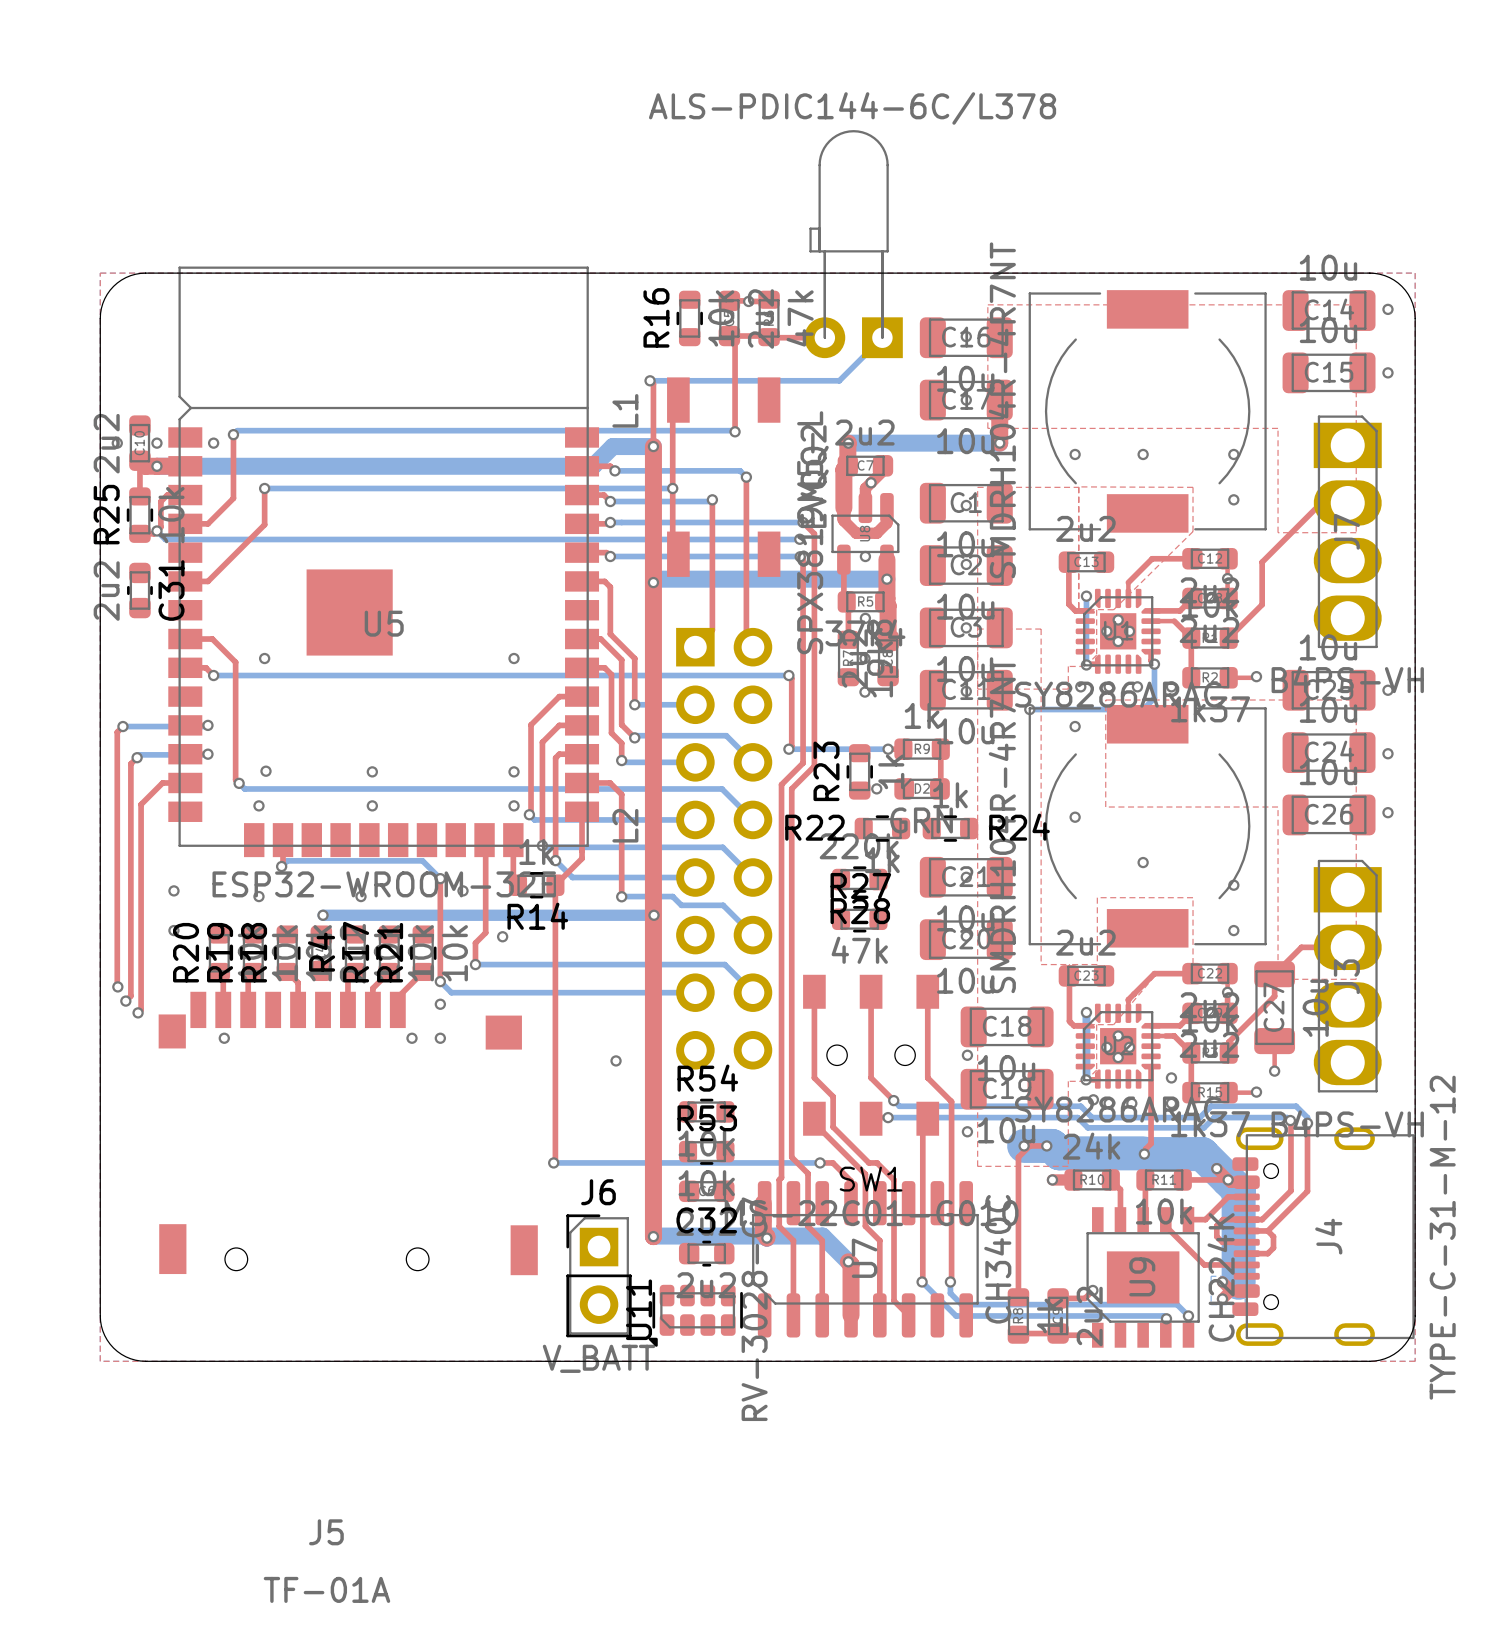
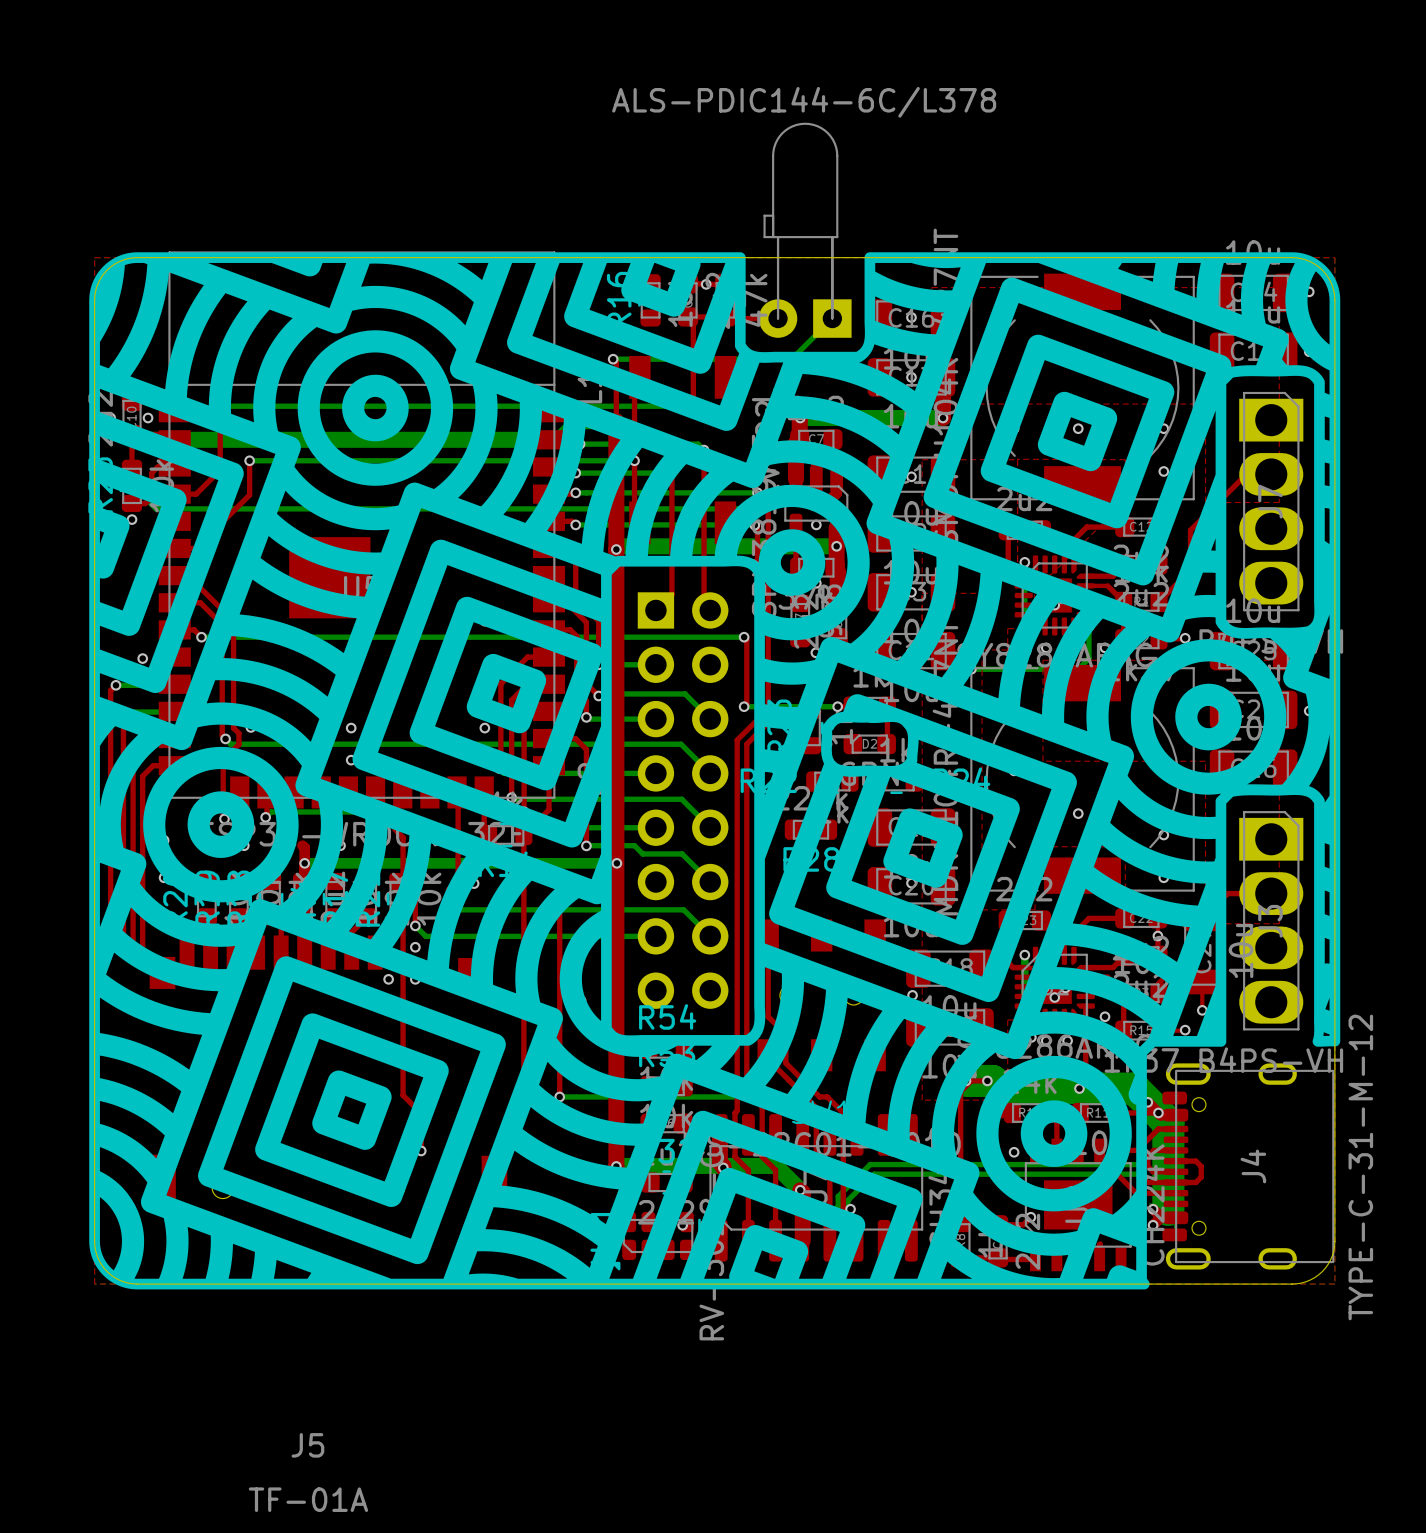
drawing: none -> [89, 252, 1341, 1290]
via position: (156, 530) -> (132, 519)
C31: 2u2 (139, 590) -> none
top track: none -> (174, 575) (188, 575) (233, 621) (233, 728) (238, 733) (238, 744) (223, 760) (224, 818)
via: none -> (142, 658)
top track: none -> (174, 765) (153, 765) (142, 776) (142, 968)
via: none -> (224, 818)
top track: none -> (394, 829) (403, 837) (403, 1095) (421, 1113) (421, 1150)
top track: none -> (302, 845) (304, 847) (304, 888)
R27: 47k (859, 919) -> none
top track: none -> (554, 868) (559, 874) (559, 1096)
top track: (871, 991) (871, 1077) (893, 1100) -> none
top track: (927, 991) (927, 1077) (951, 1101) (950, 1281) -> none
bottom track: (893, 1100) (899, 1106) (1080, 1106) (1092, 1117) (1199, 1117) (1211, 1106) (1296, 1106) (1307, 1117) (1307, 1123) -> none
via: (893, 1100) -> none
bottom track: (888, 1117) (1077, 1117) (1087, 1127) (1204, 1127) (1214, 1117) (1287, 1117) (1290, 1120) -> none
via: (888, 1117) -> none
top track: (927, 1118) (922, 1123) (922, 1281) -> none
top track: (1290, 1120) (1290, 1190) (1262, 1219) (1246, 1219) -> none
via: (1290, 1120) -> none
top track: (1307, 1123) (1307, 1191) (1267, 1230) -> none
via: (1307, 1123) -> none
via: (967, 1131) -> none
bottom track: (553, 1162) (593, 1162) -> none
via position: (553, 1162) -> (559, 1096)
via: (820, 1162) -> none
via: none -> (421, 1150)
via: none -> (1014, 1152)
bottom track: none -> (1142, 1161) (1139, 1164) (870, 1164) (838, 1196) (838, 1206) (835, 1209)
top track: none -> (1142, 1177) (1147, 1182) (1176, 1182)
bottom track: none -> (1142, 1177) (1139, 1174) (874, 1174) (847, 1200) (847, 1206) (850, 1209)
J6: V_BATT (599, 1275) -> none
bottom track: (922, 1281) (956, 1315) (1163, 1315) (1166, 1318) -> none
via position: (922, 1281) -> (850, 1209)
bottom track: (950, 1281) (950, 1293) (961, 1304) (1177, 1304) (1188, 1315) -> none
via: (950, 1281) -> none
via: none -> (682, 1225)
via: (1188, 1315) -> none
via: (1166, 1318) -> none

